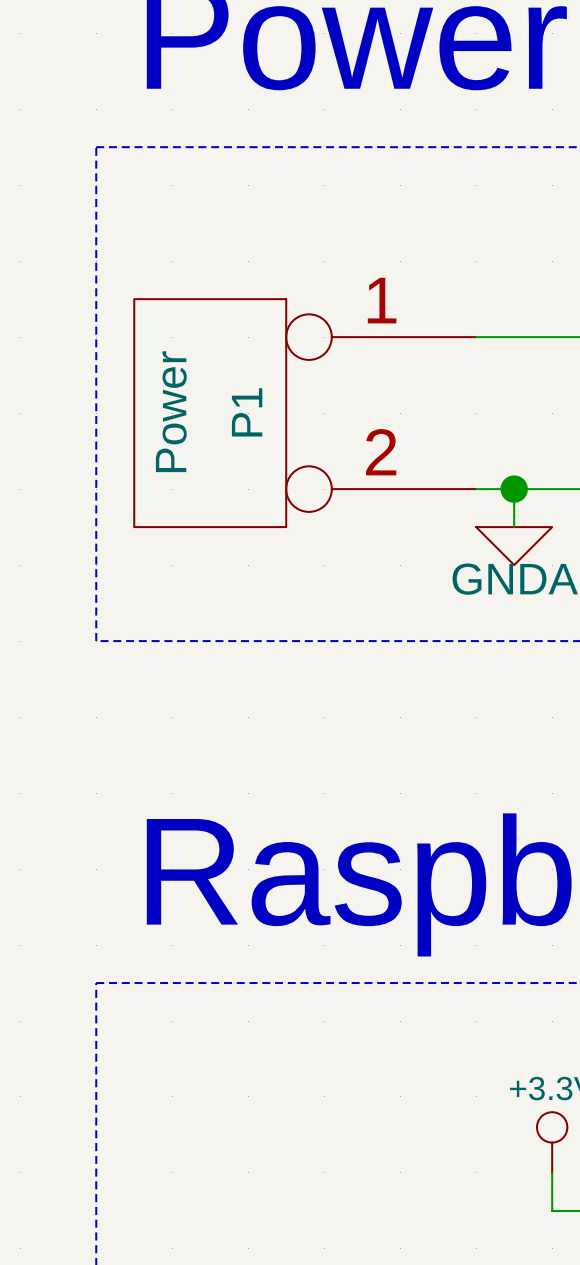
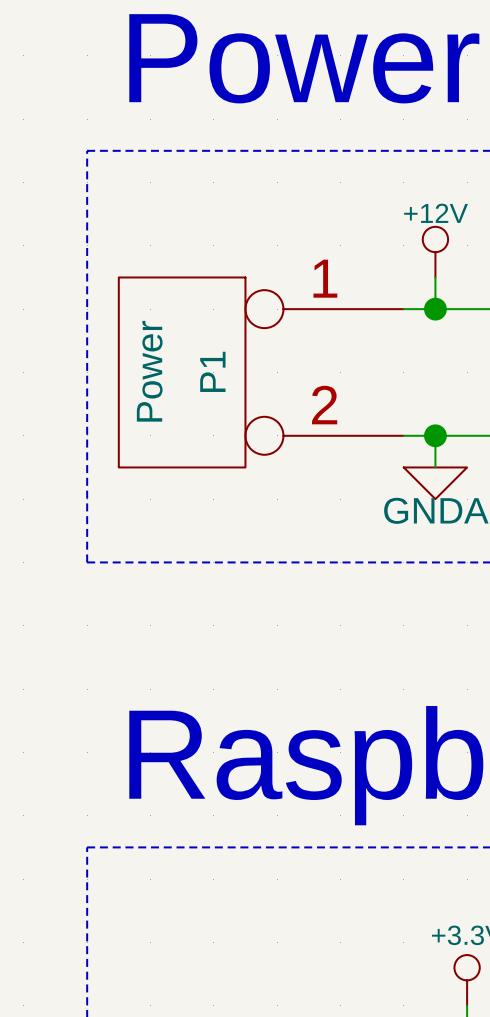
power symbol: none -> +12V (435, 252)
wire: none -> (435, 277) (435, 309)
junction: none -> (435, 309)

